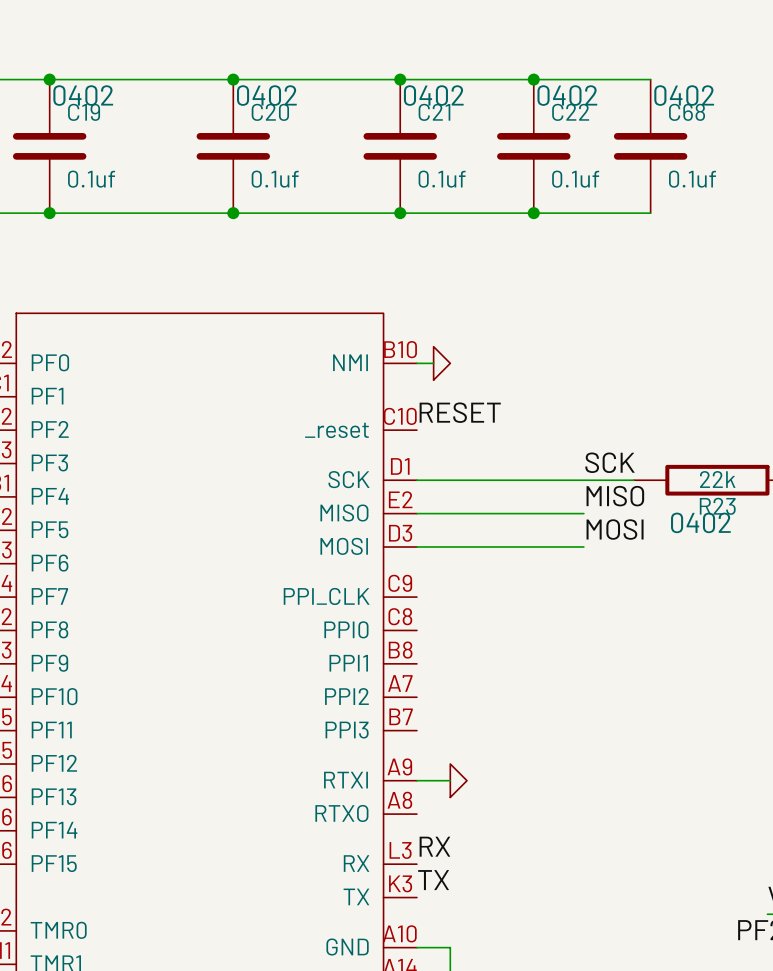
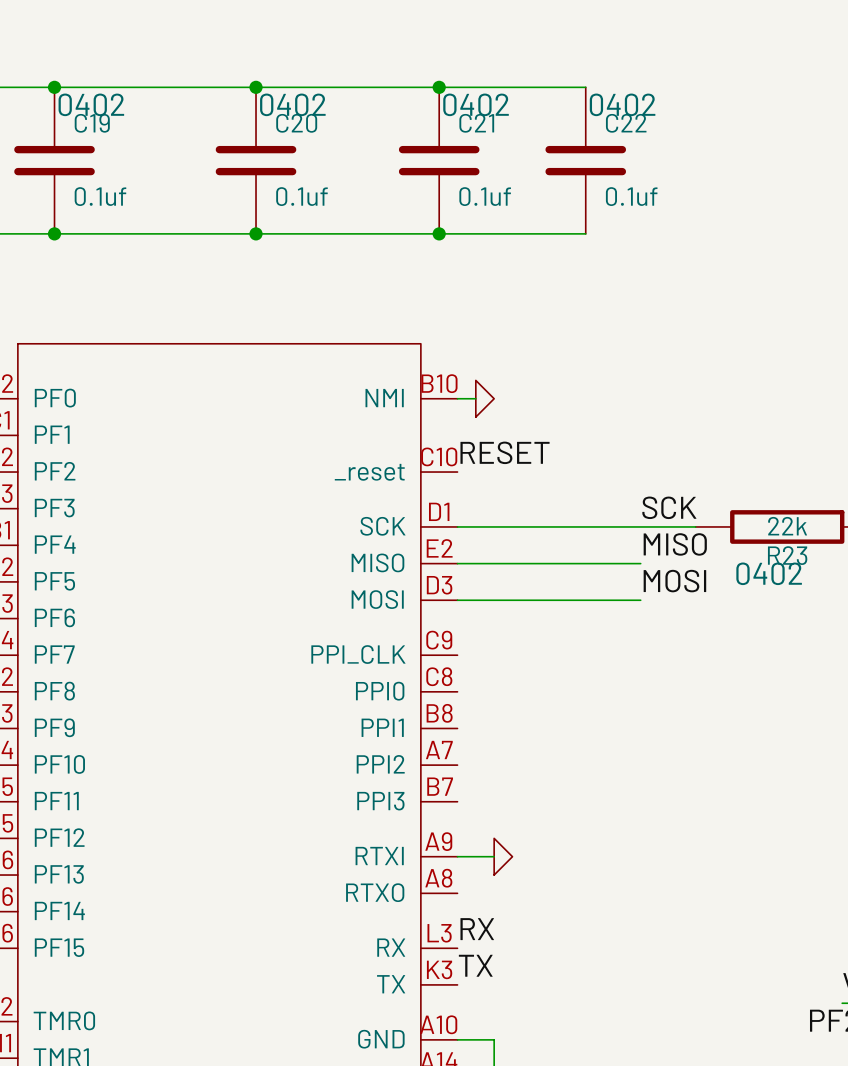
wire: (533, 79) (650, 79) -> none
junction: (533, 79) -> none
C68: 0.1uf (650, 146) -> none
wire: (533, 213) (650, 213) -> none
junction: (533, 213) -> none

